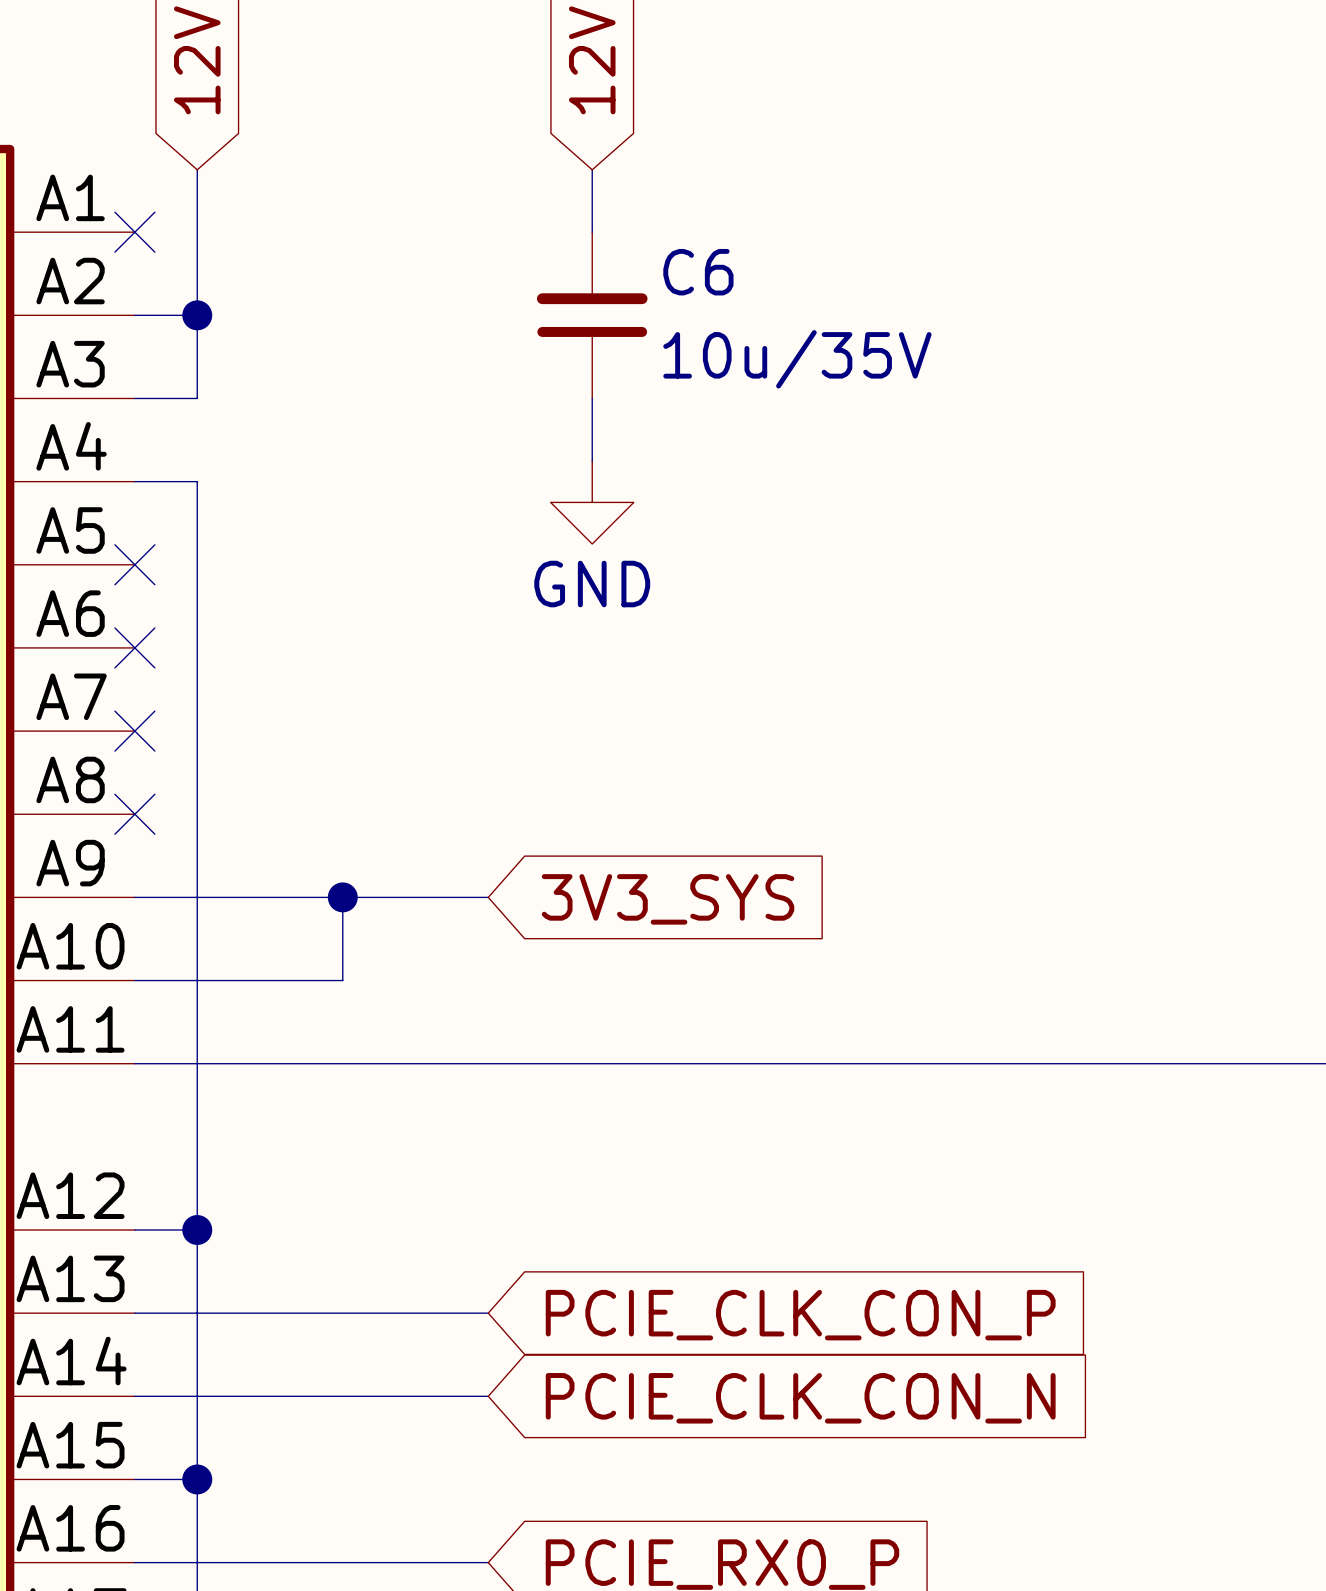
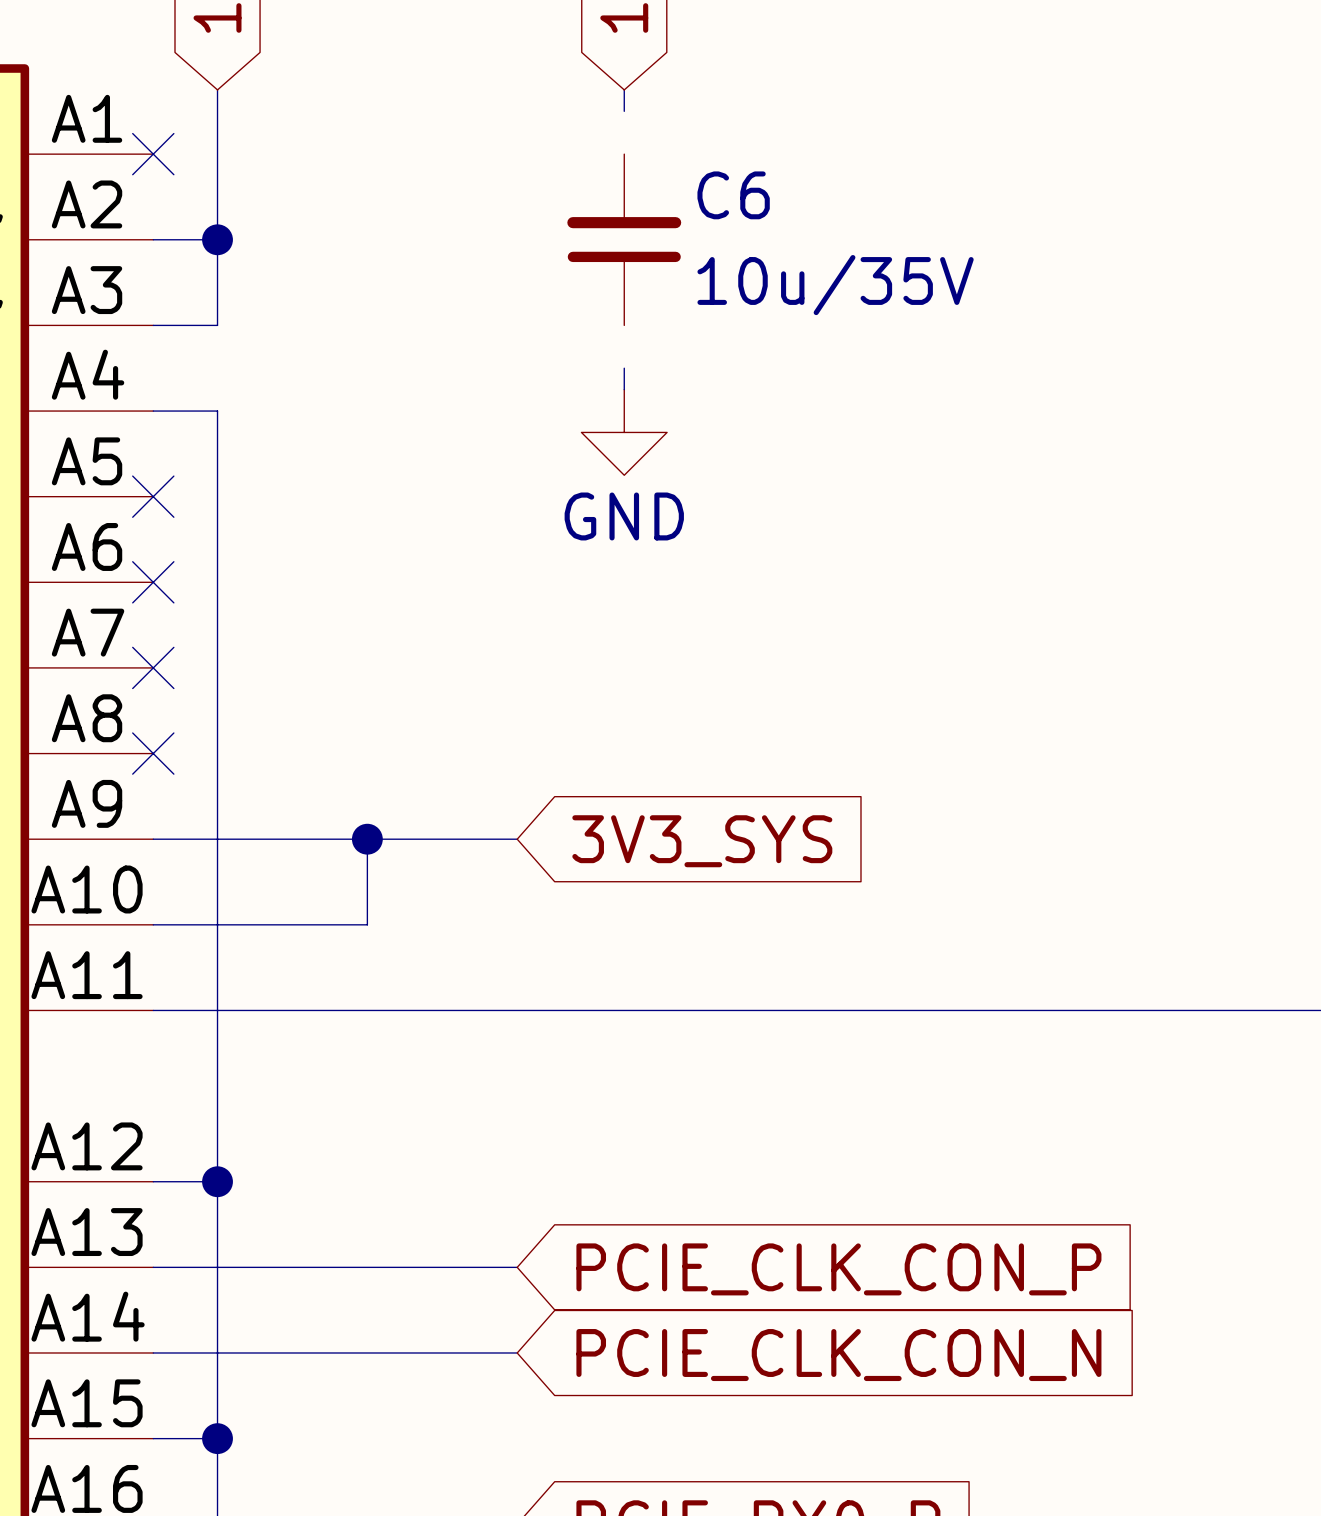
wire: (592, 190) (592, 232) -> none
wire: (592, 398) (592, 440) -> none

